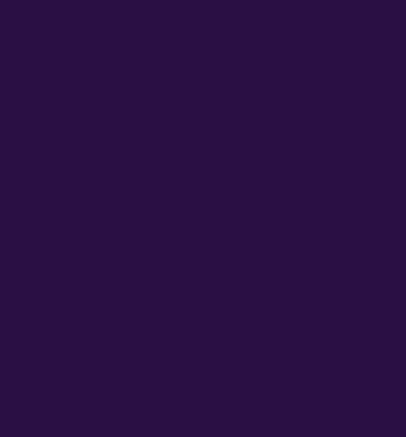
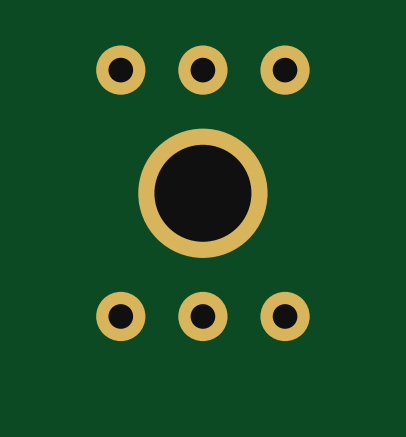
part: none -> (202, 193)

